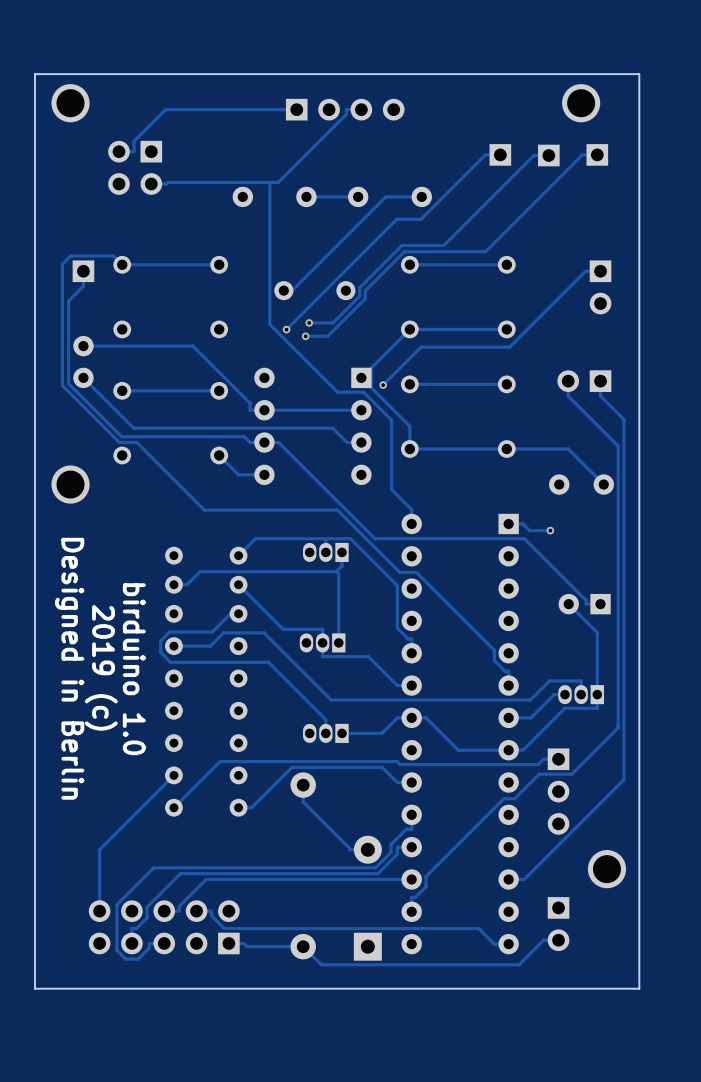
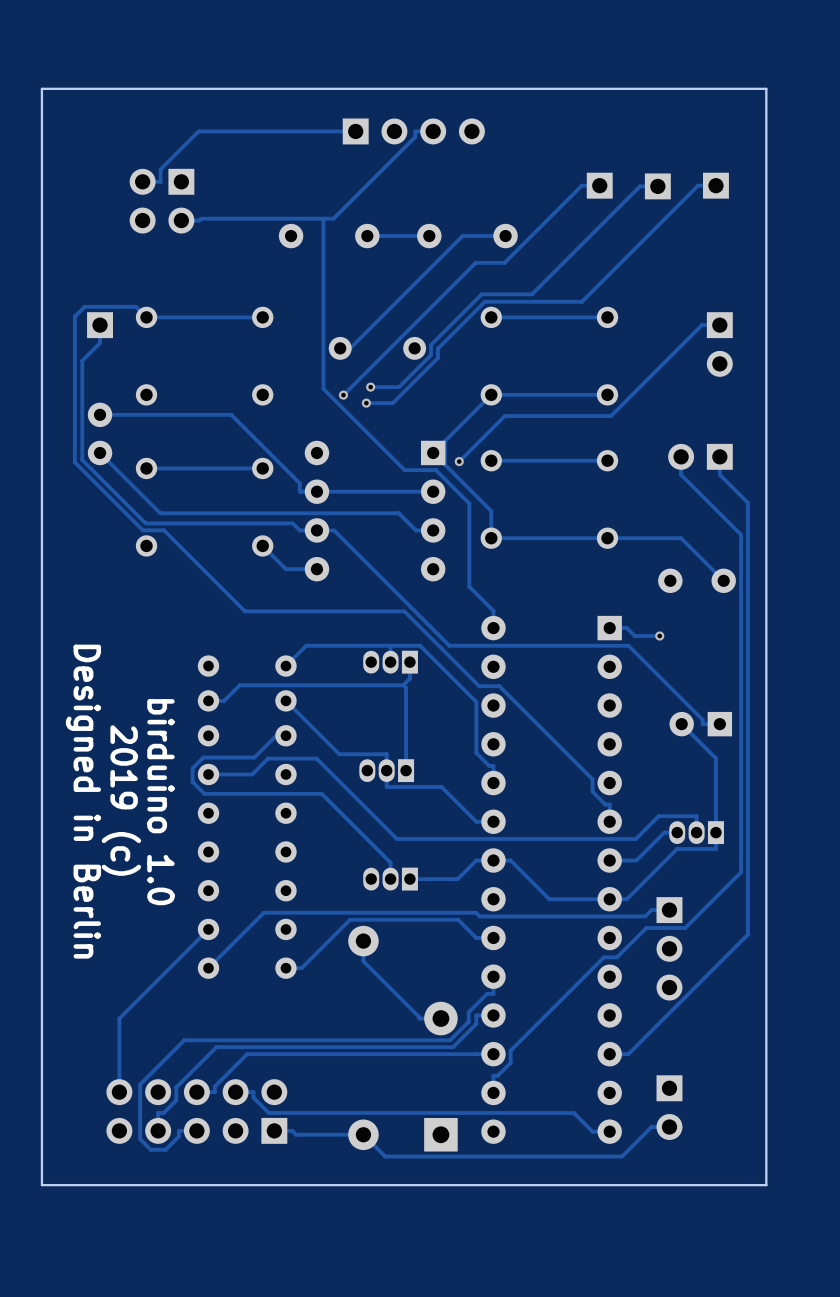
part: (70, 103) -> none
part: (581, 103) -> none
part: (70, 484) -> none
part: (607, 869) -> none

